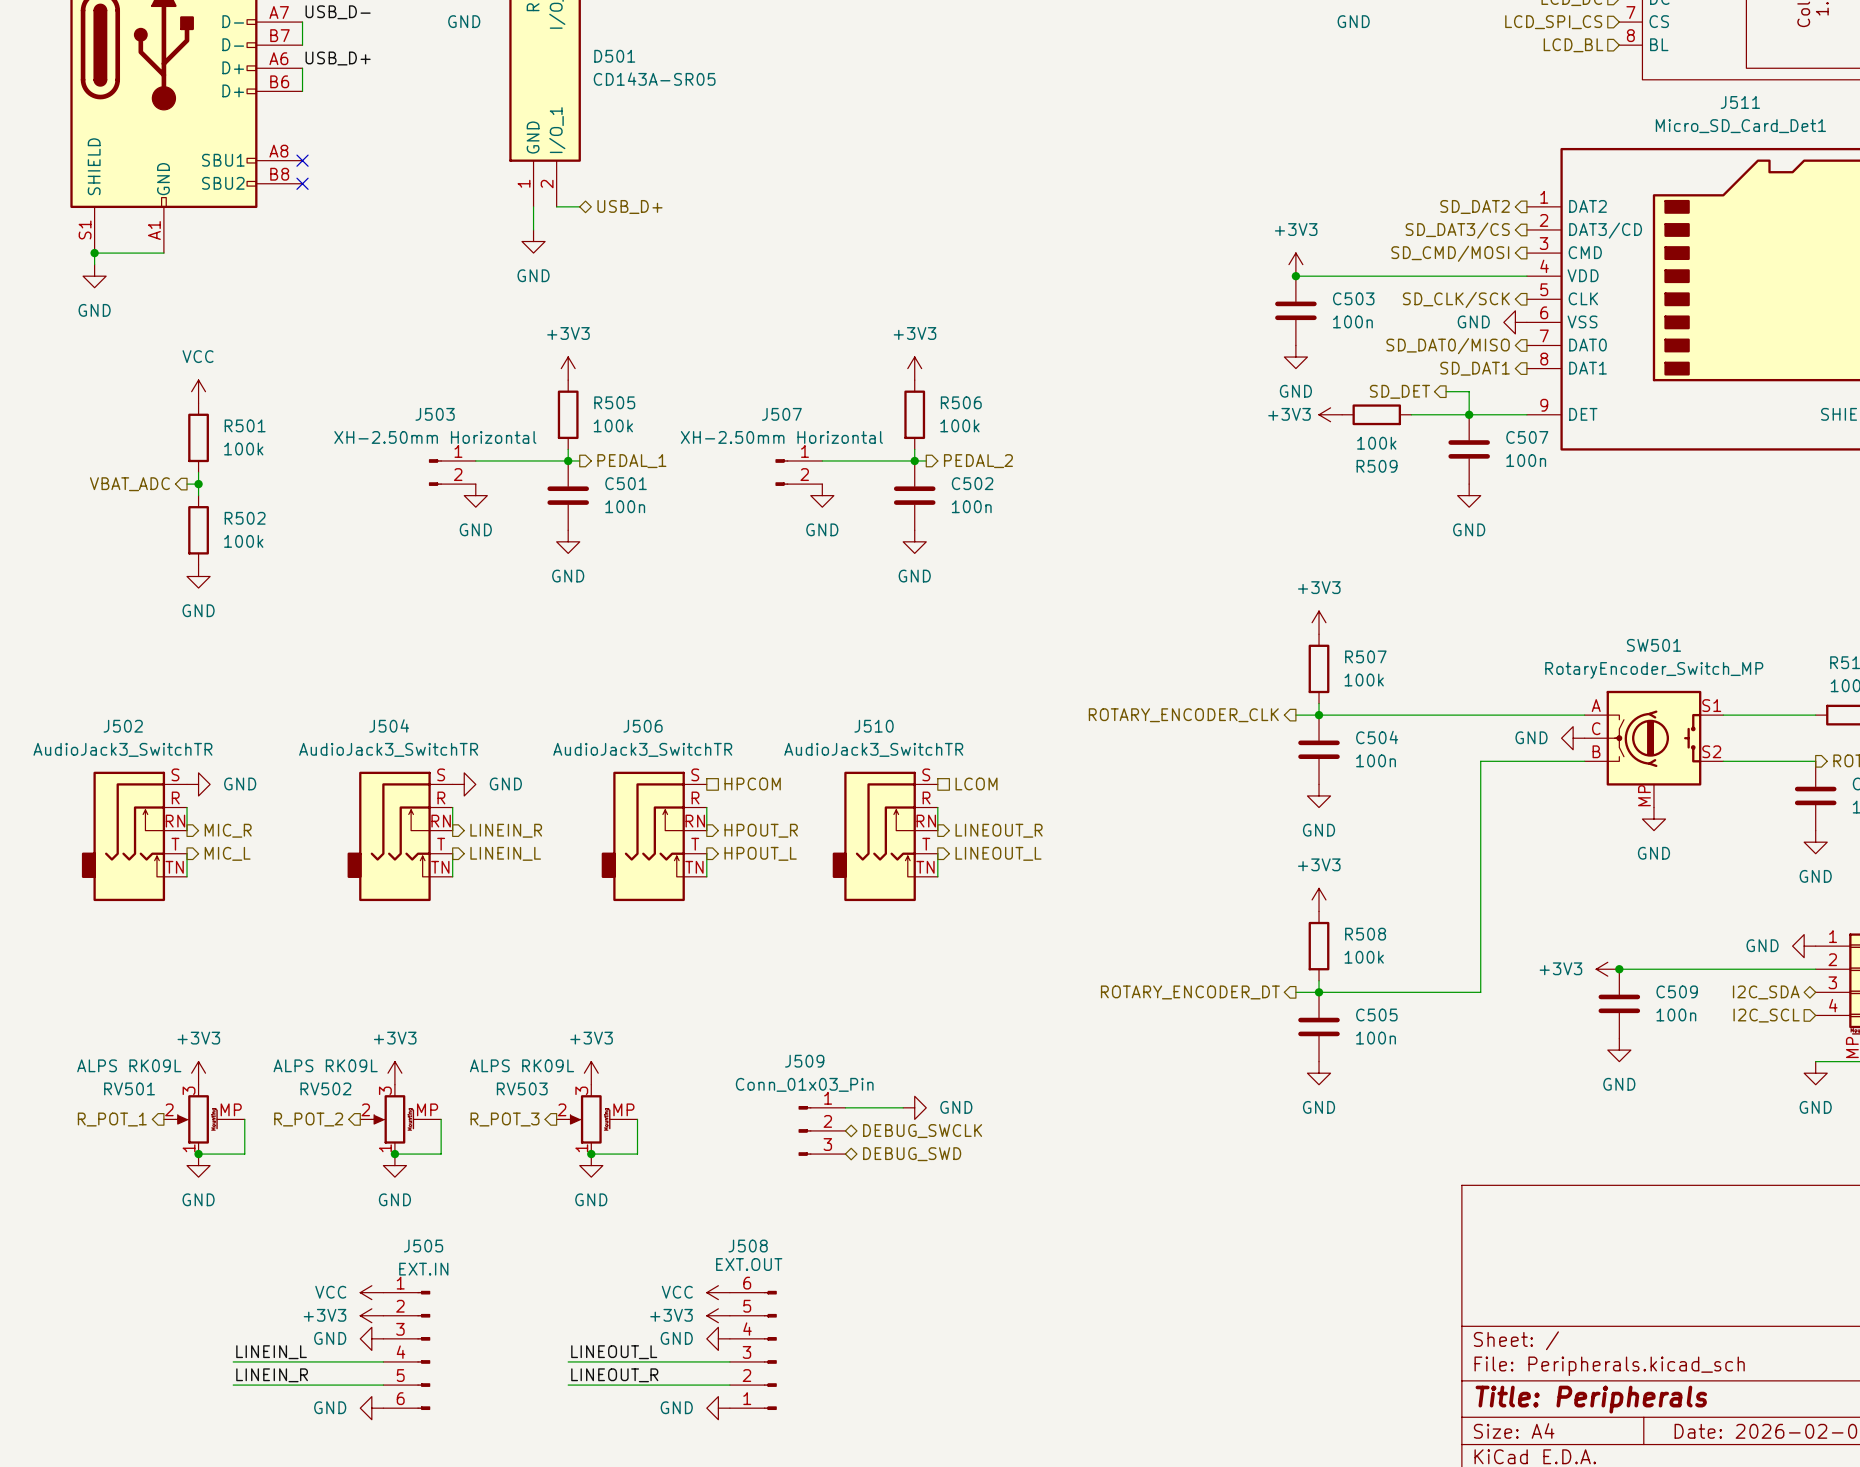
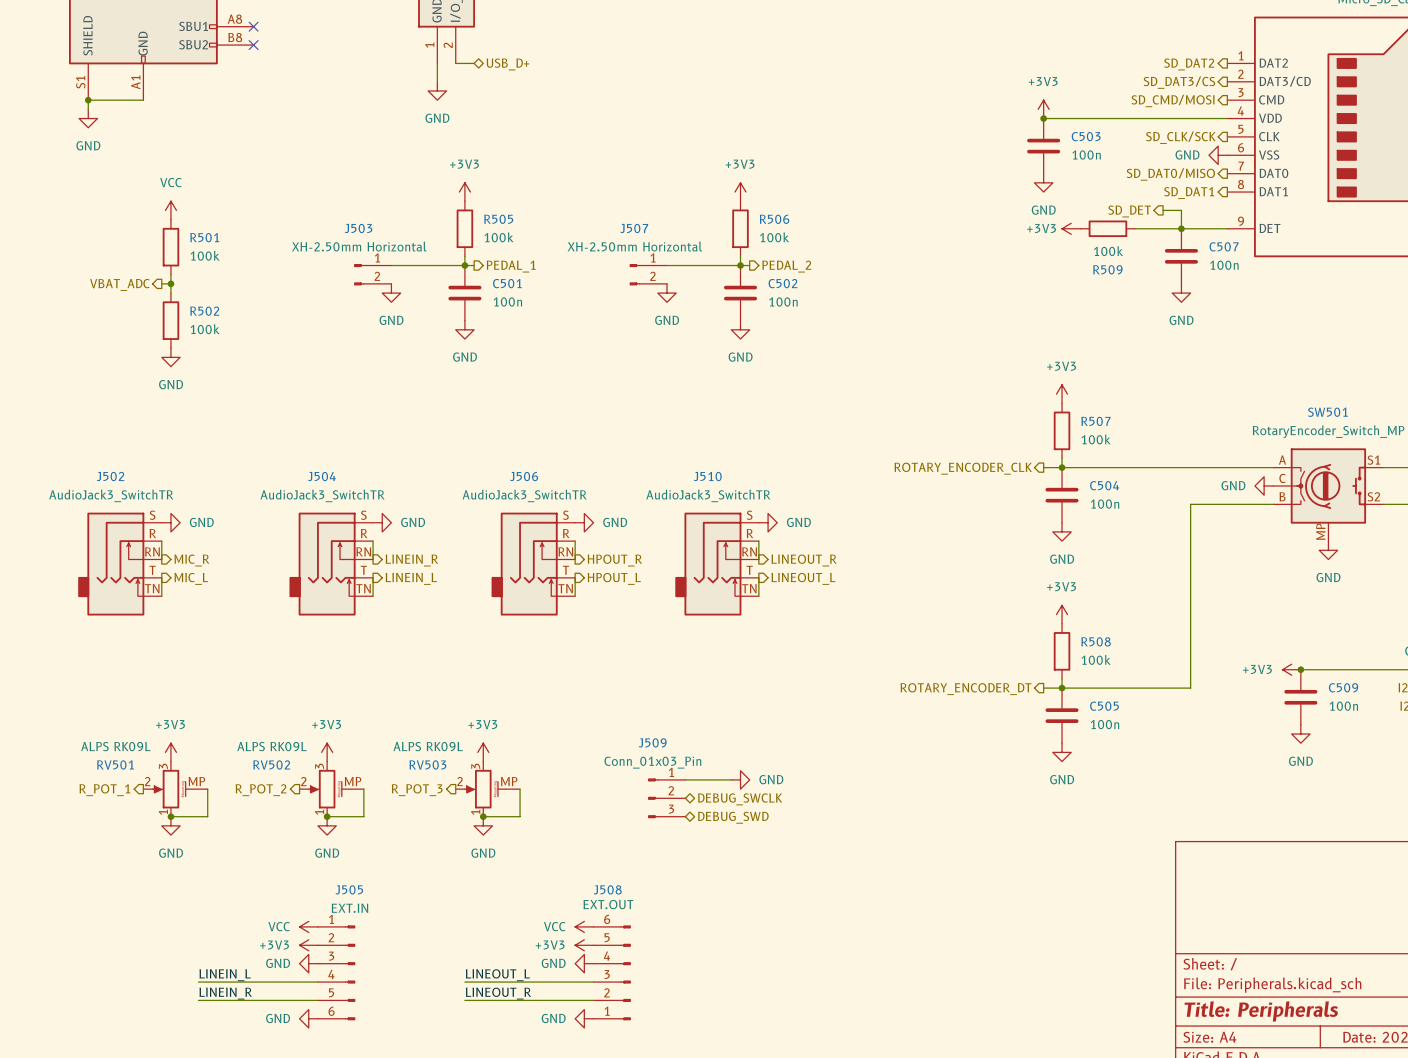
hierarchical label: HPCOM (752, 783) -> none
hierarchical label: LCOM (976, 783) -> none
power symbol: none -> GND (584, 522)
power symbol: none -> GND (768, 522)

